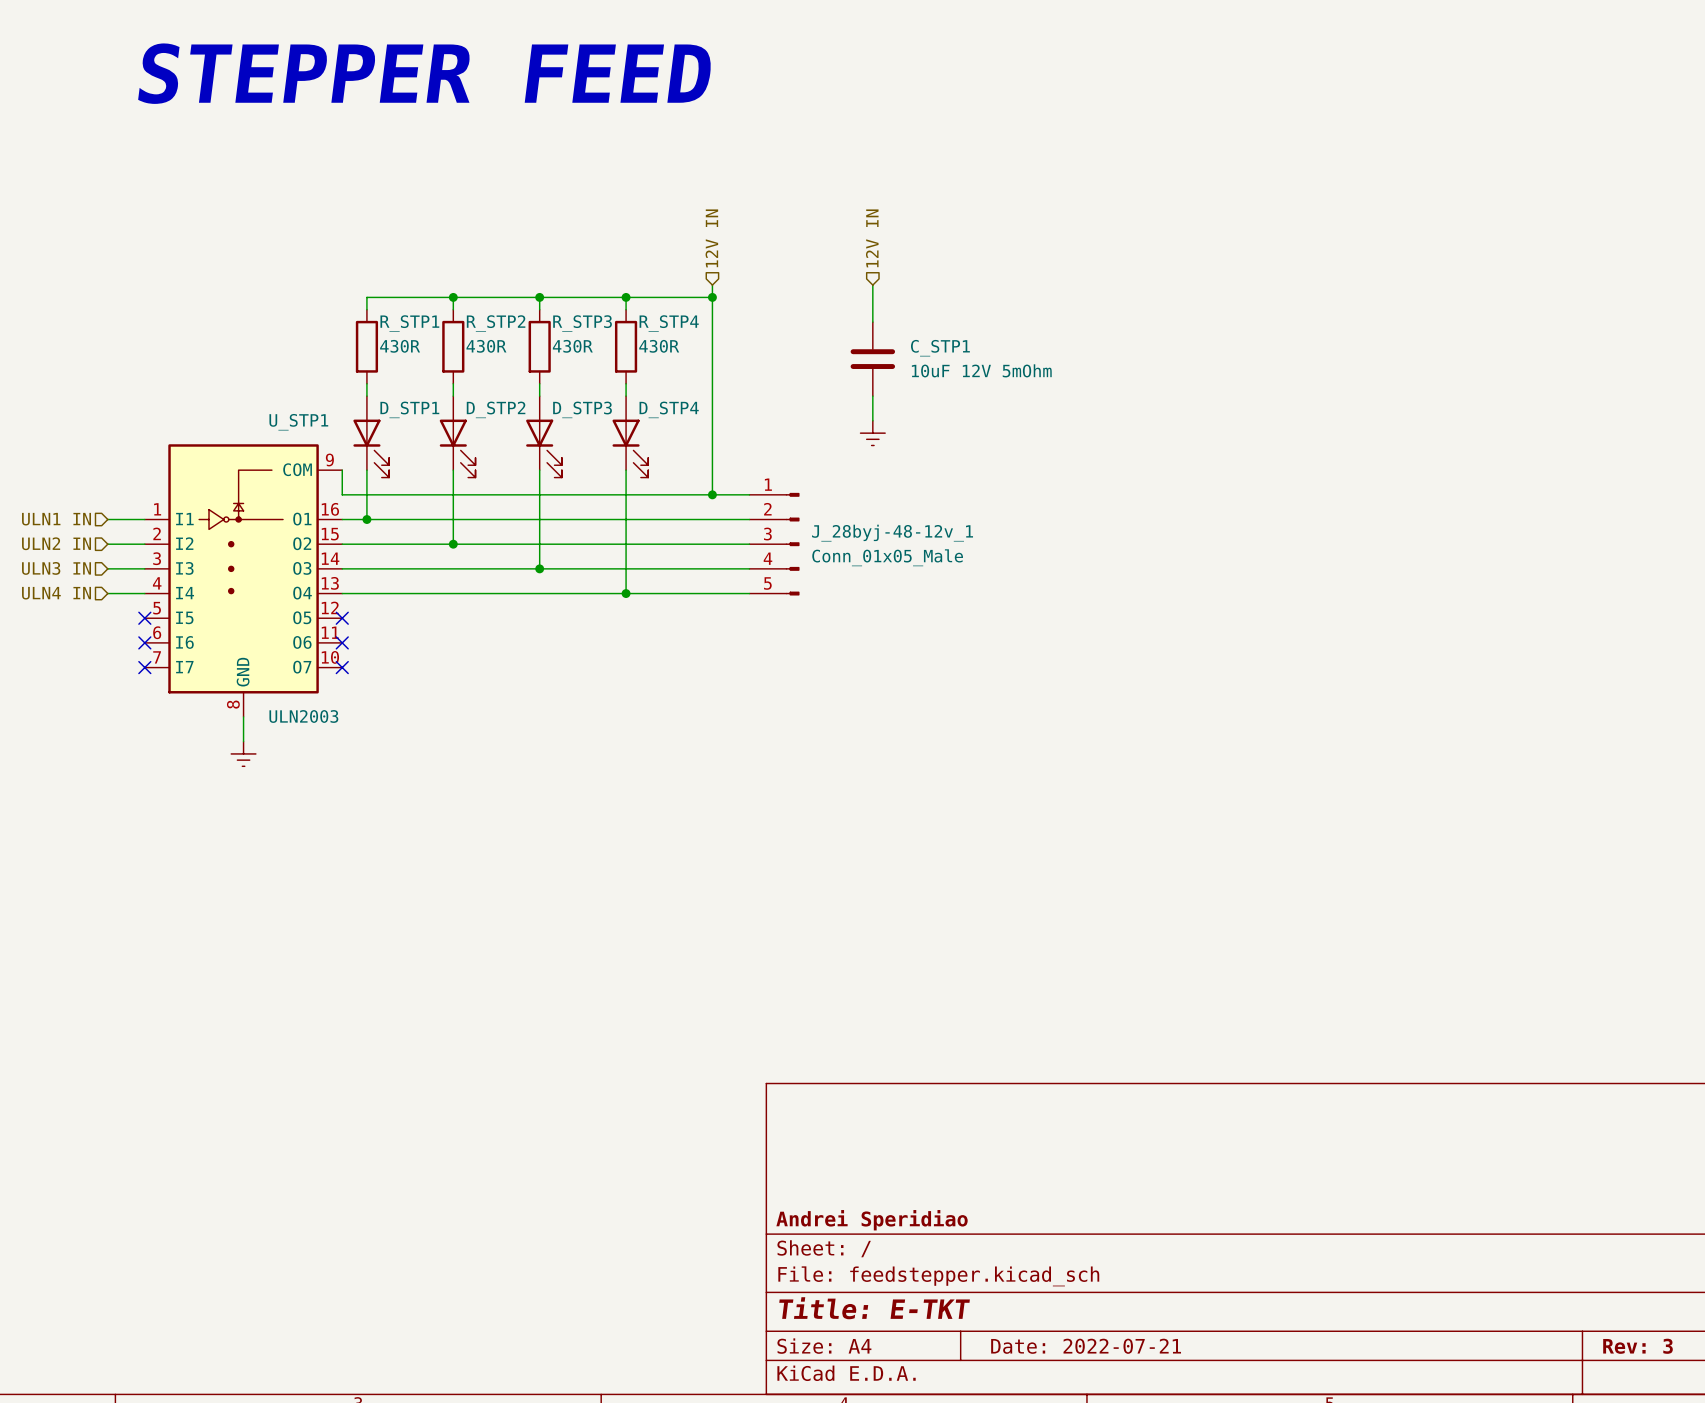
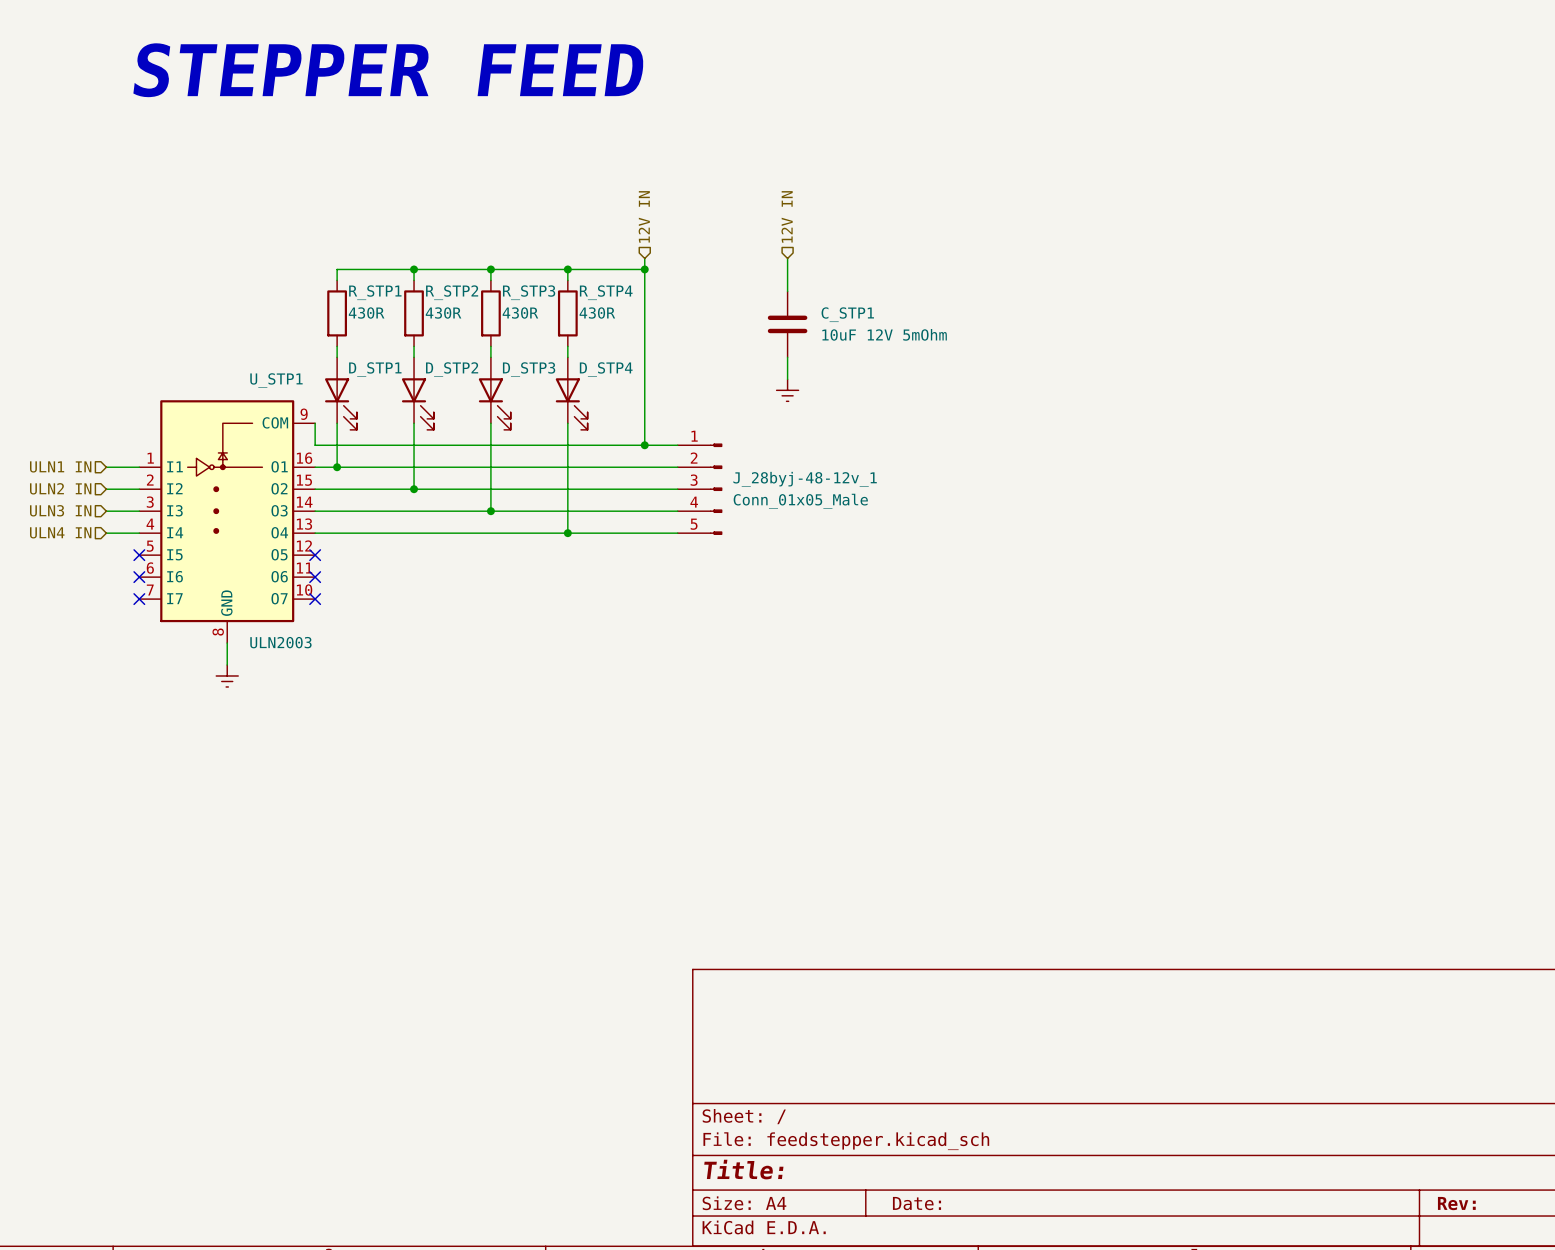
title block: Andrei Speridiao (872, 1220) -> none
title block: Title: E-TKT (874, 1308) -> Title: (743, 1169)
title block: Date: 2022-07-21 (1086, 1346) -> Date: (916, 1203)
title block: Rev: 3 (1638, 1346) -> Rev: (1456, 1203)

